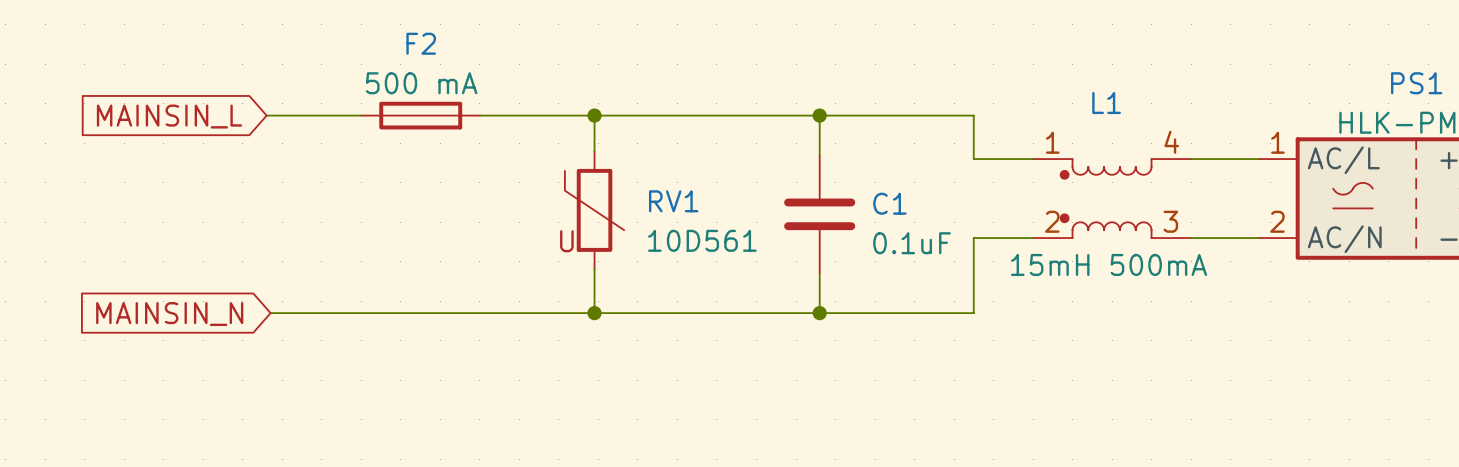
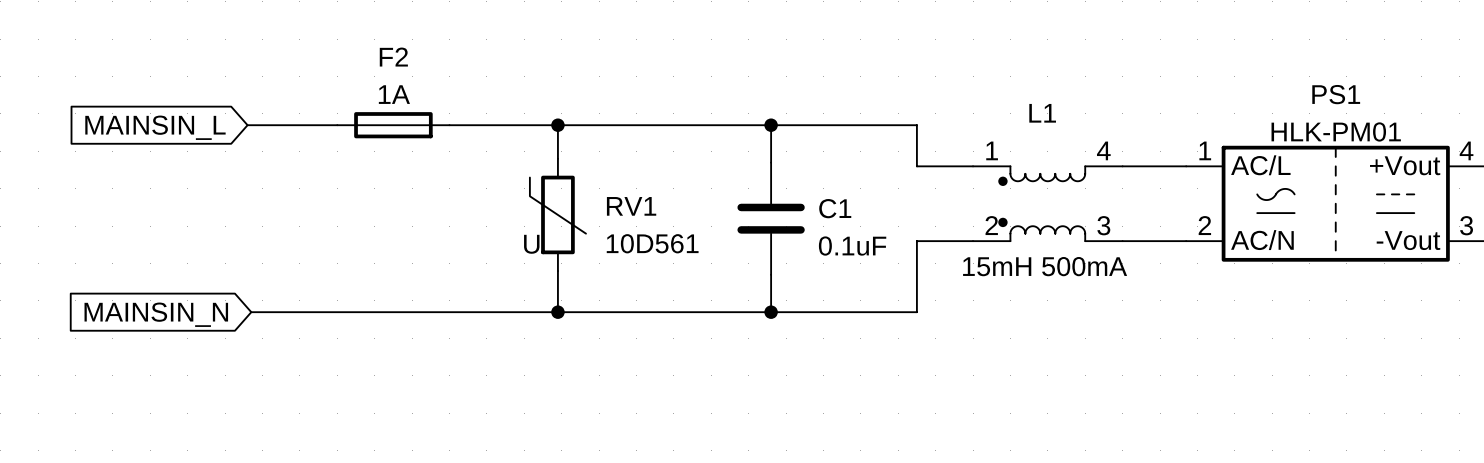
F2 value: 500 mA (421, 83) -> 1A (394, 94)

